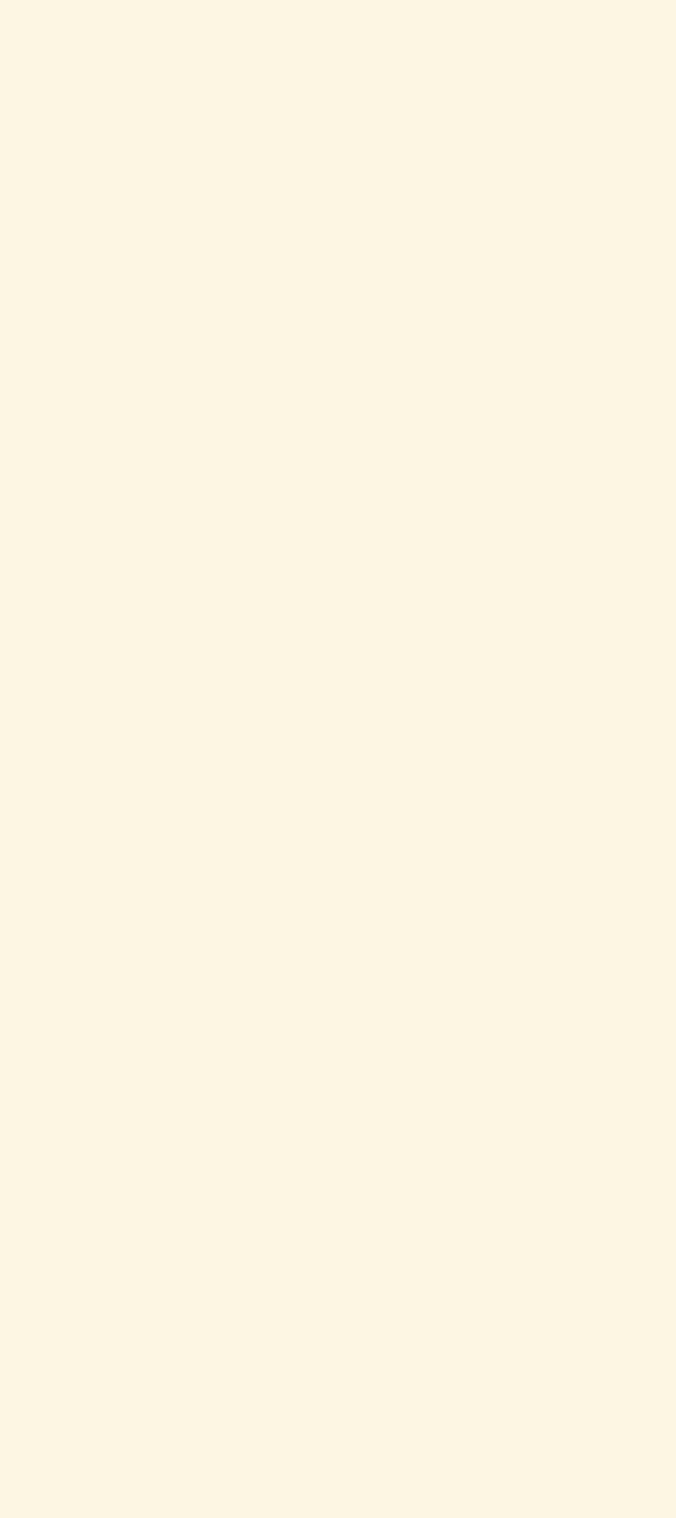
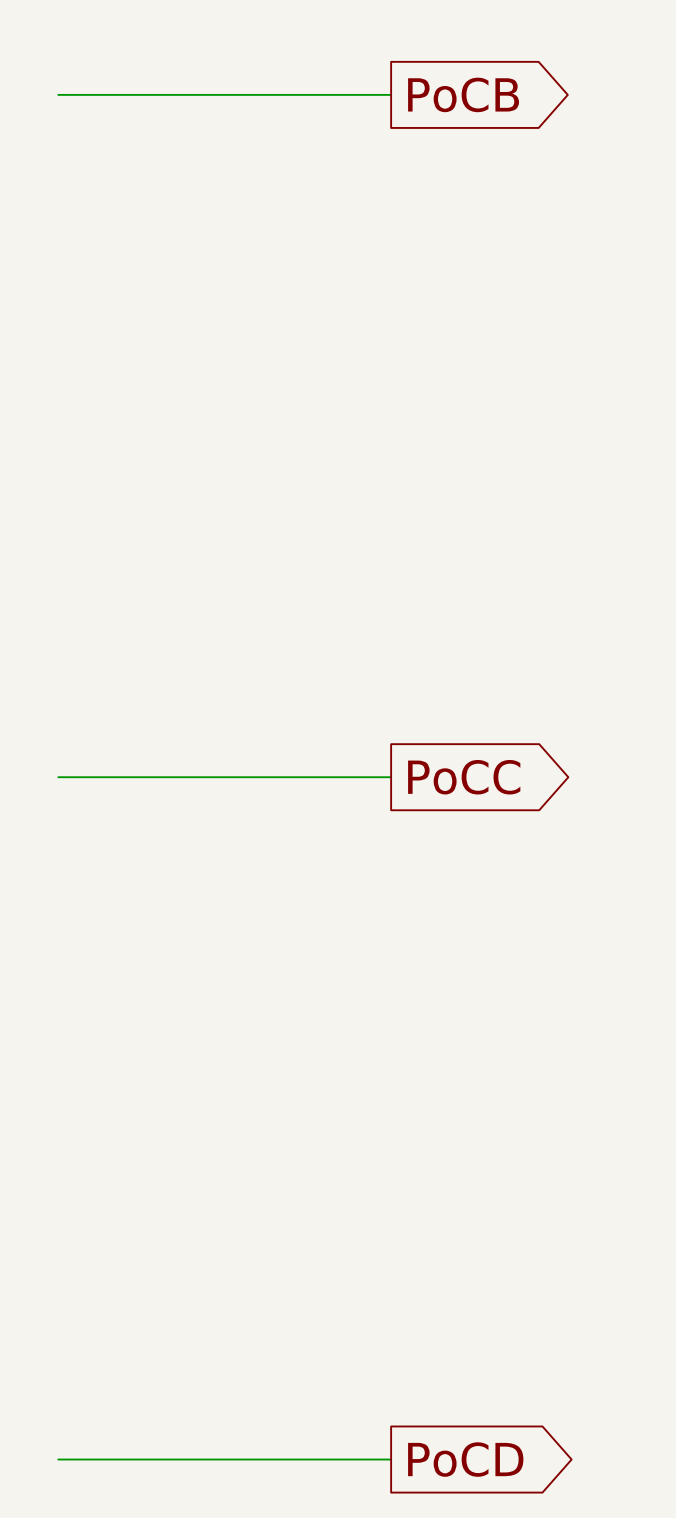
wire: none -> (58, 94) (391, 94)
global label: none -> PoCB (463, 94)
wire: none -> (58, 777) (391, 777)
global label: none -> PoCC (464, 777)
wire: none -> (58, 1459) (391, 1459)
global label: none -> PoCD (465, 1459)

